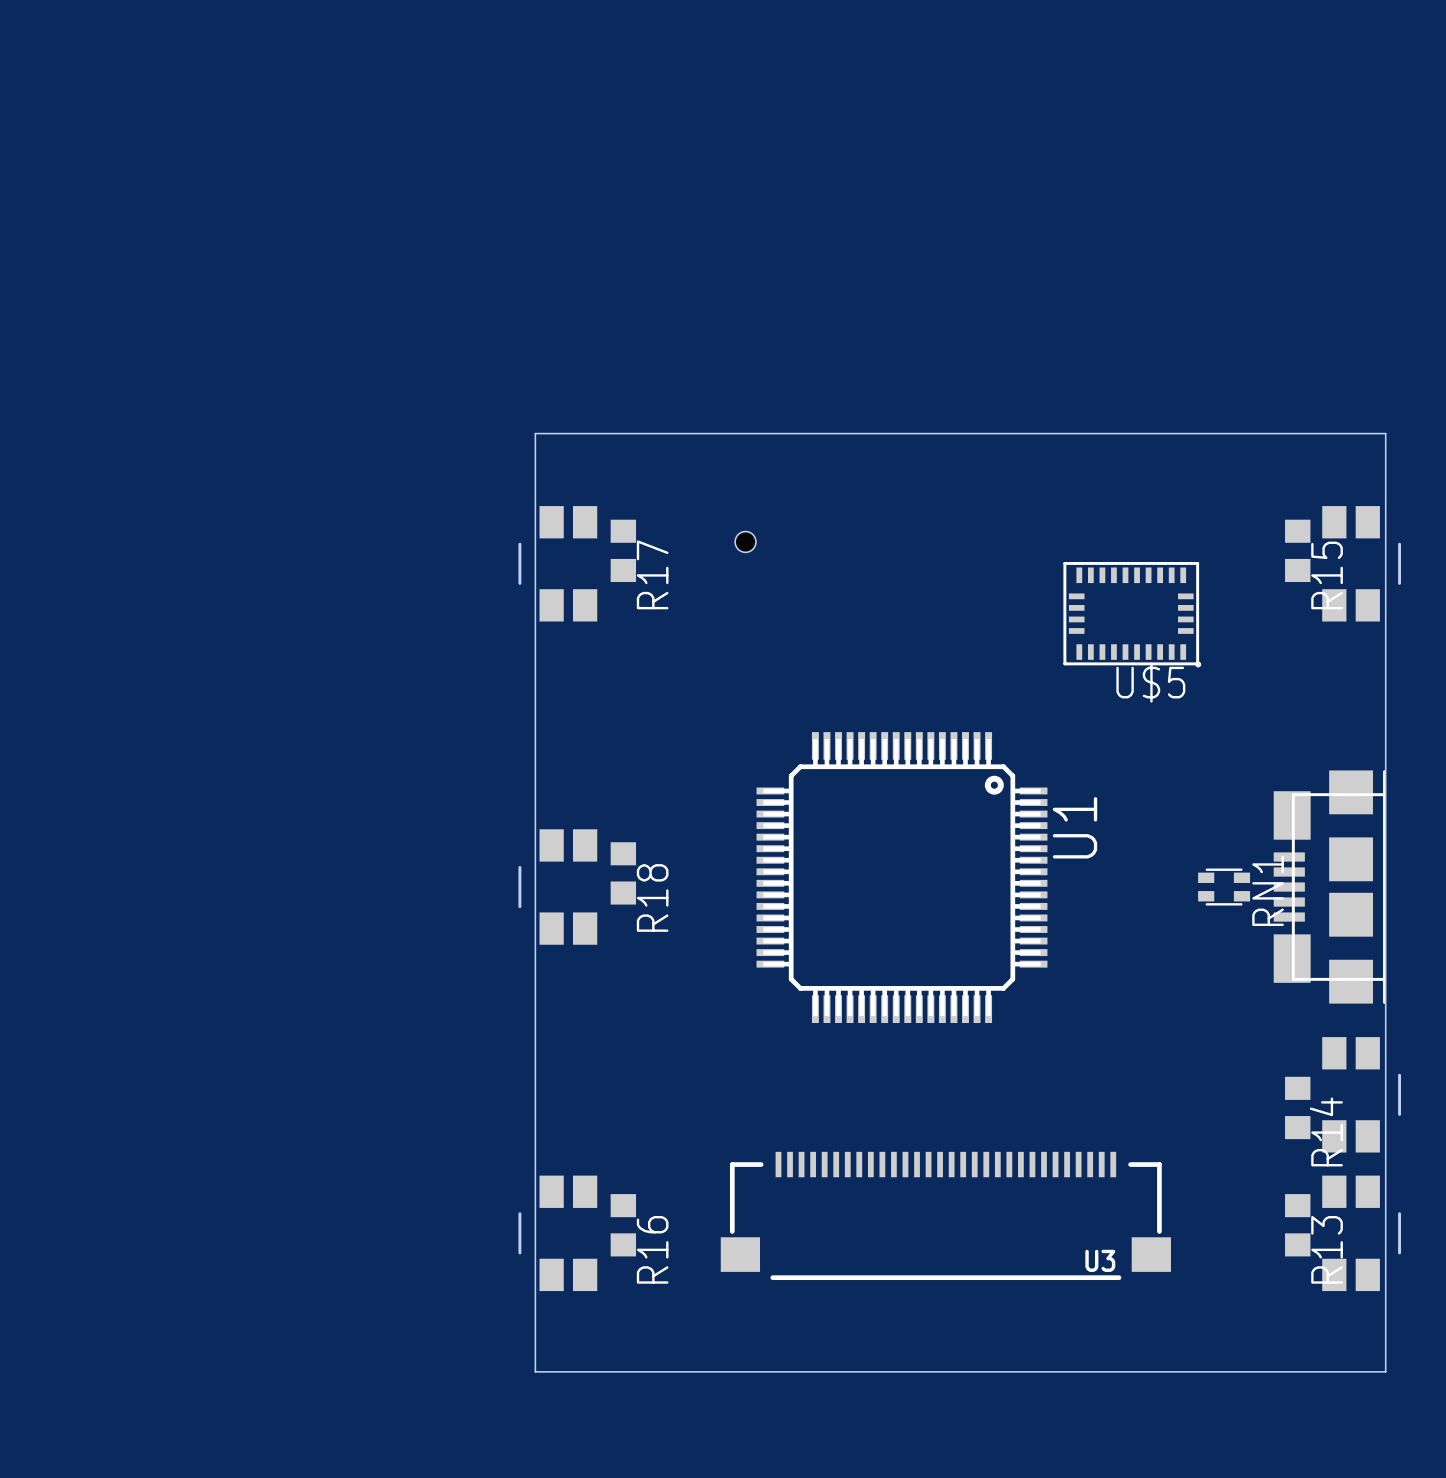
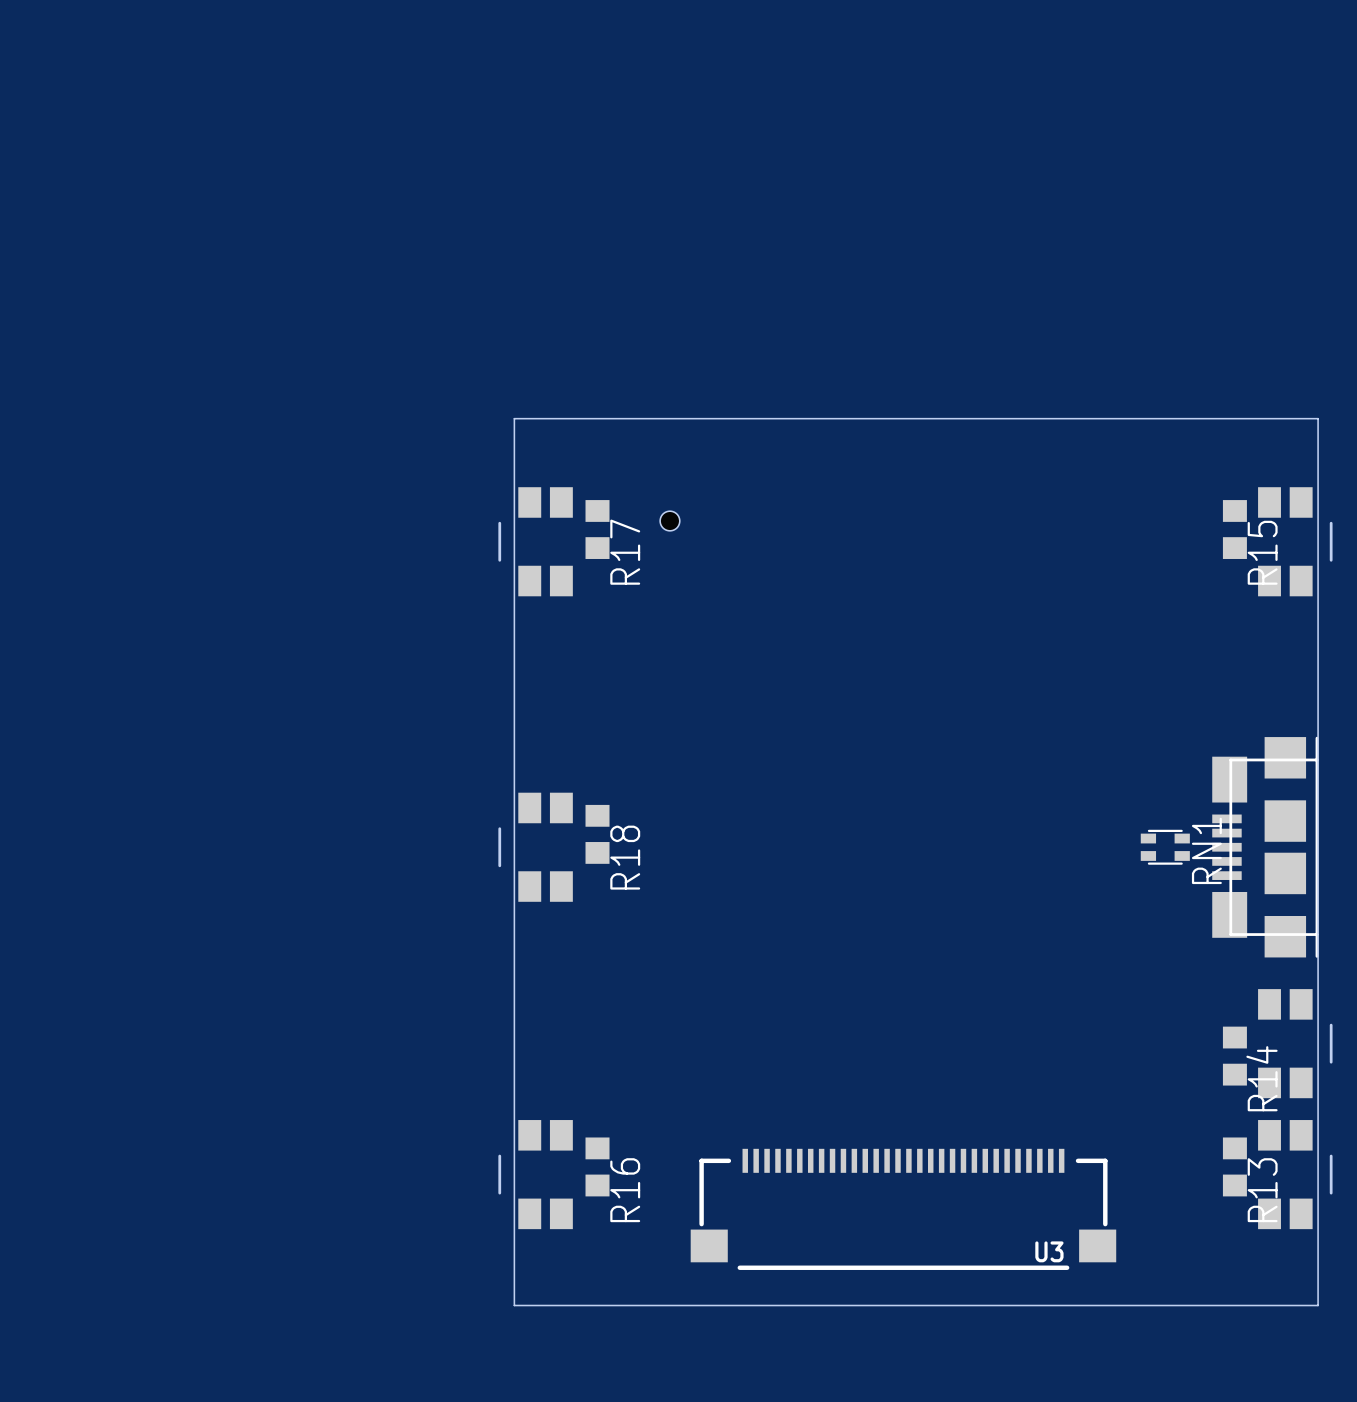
part position: (745, 541) -> (669, 521)
U$5: (1132, 614) -> none
U1: (902, 877) -> none
U3 position: (945, 1215) -> (903, 1209)

